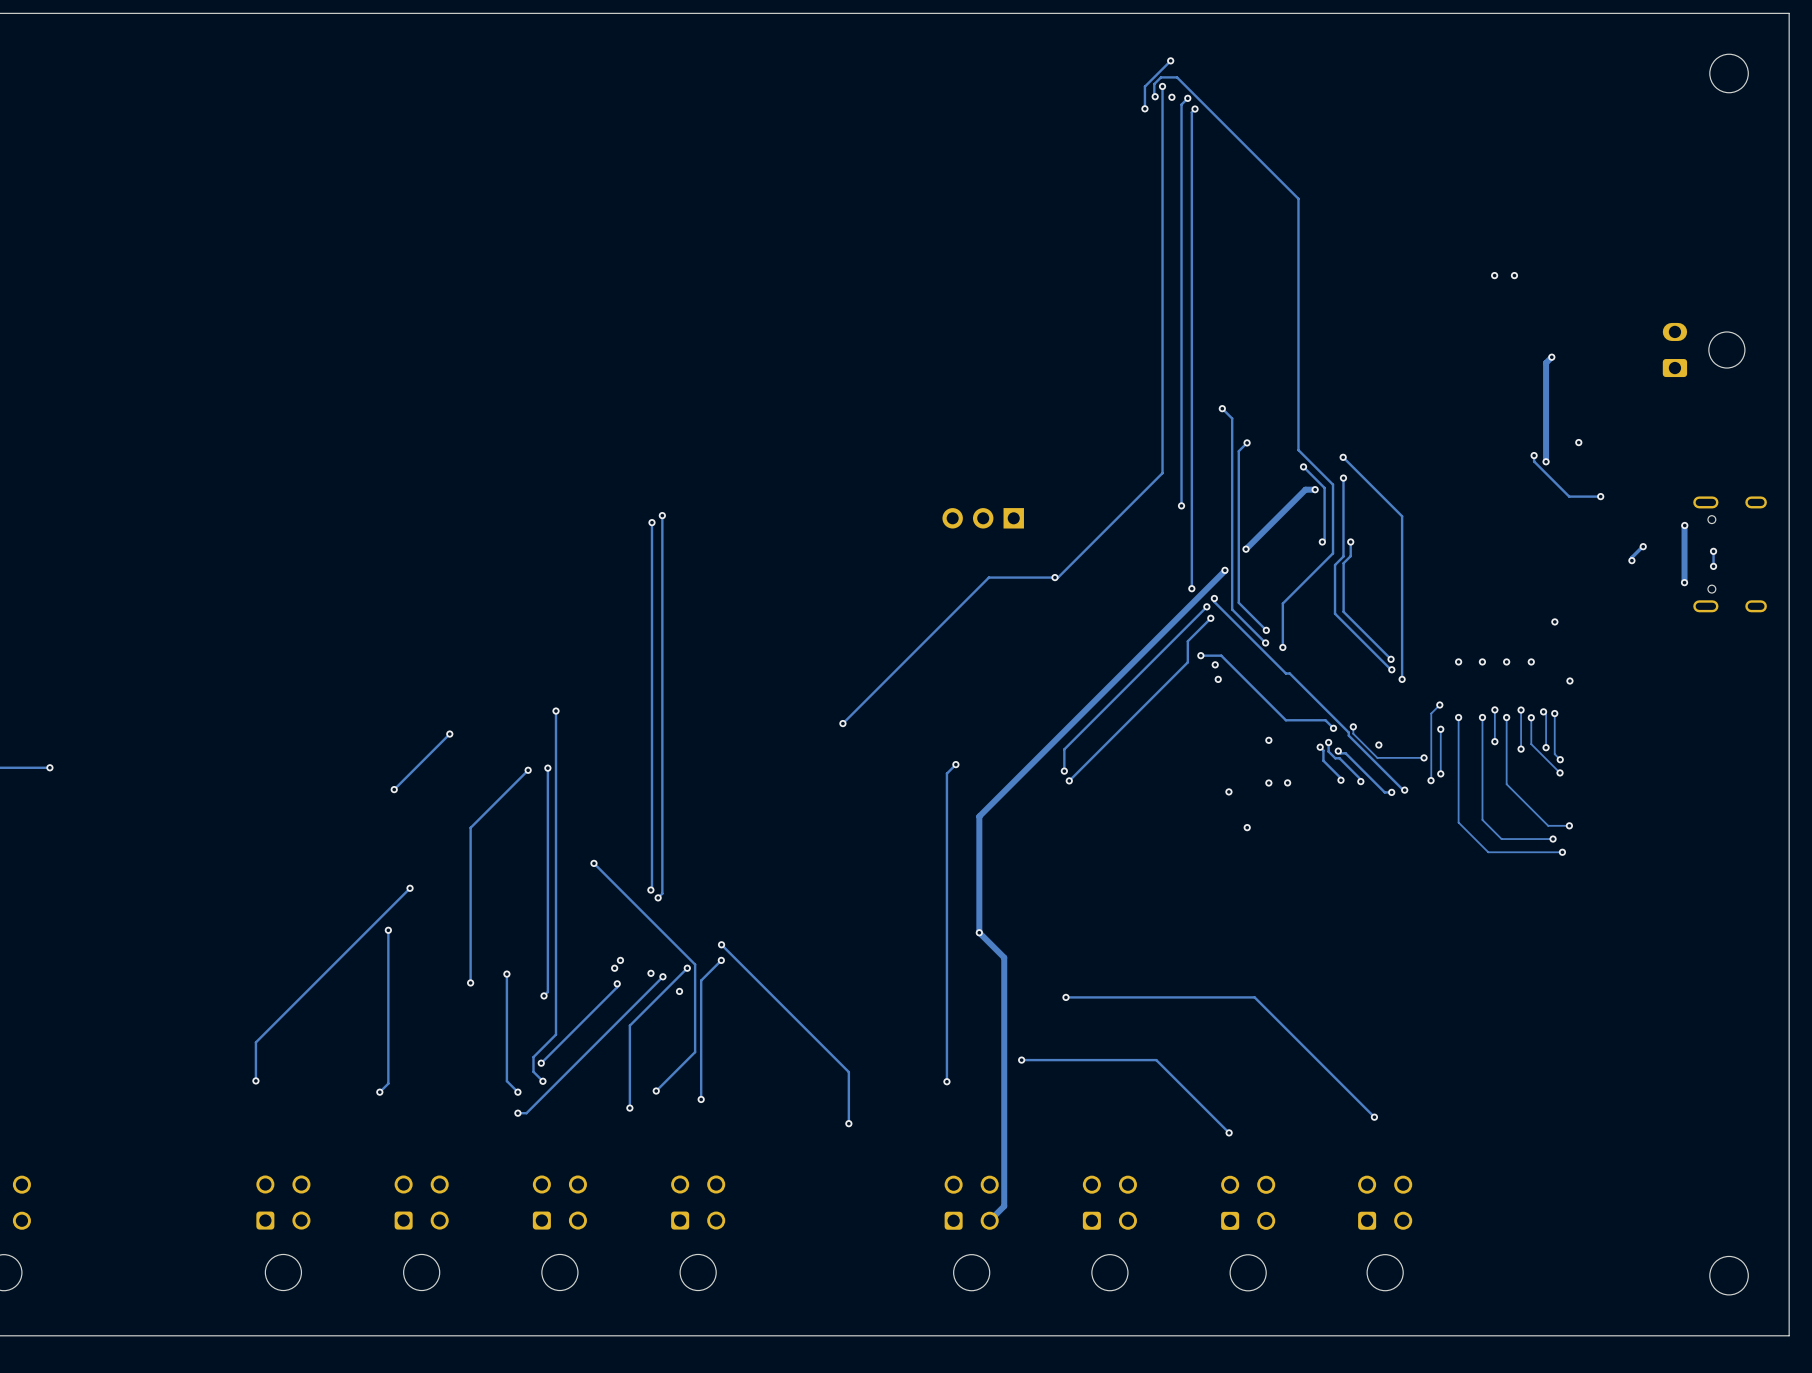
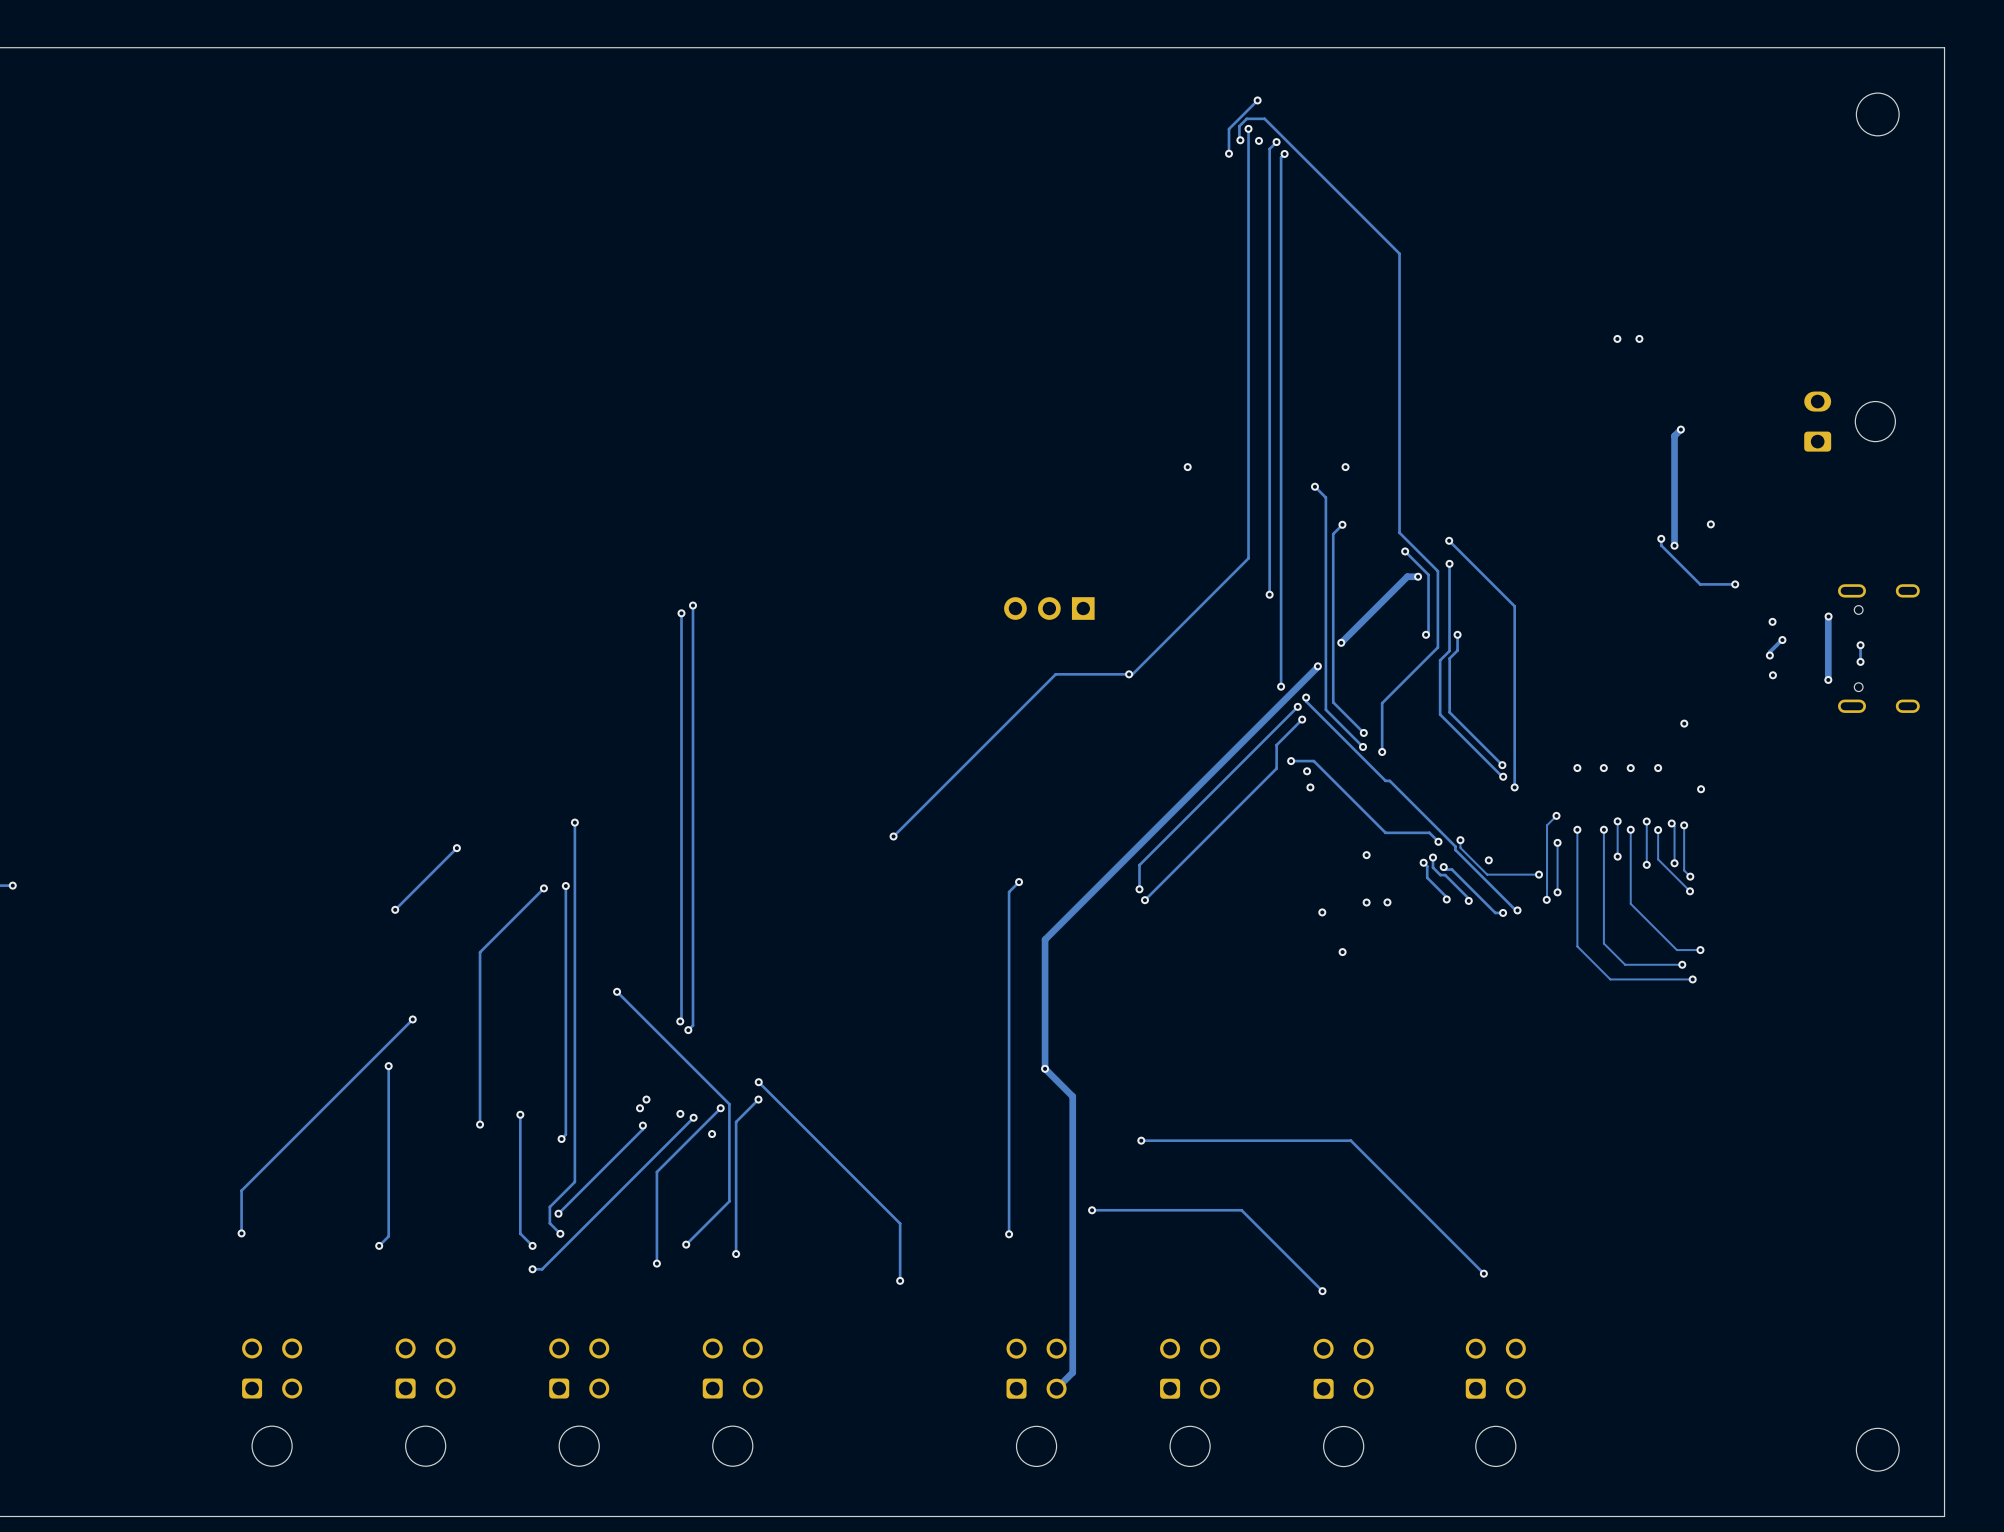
via: none -> (1187, 467)
via: none -> (1345, 467)
via: none -> (1772, 621)
via: none -> (1772, 675)

